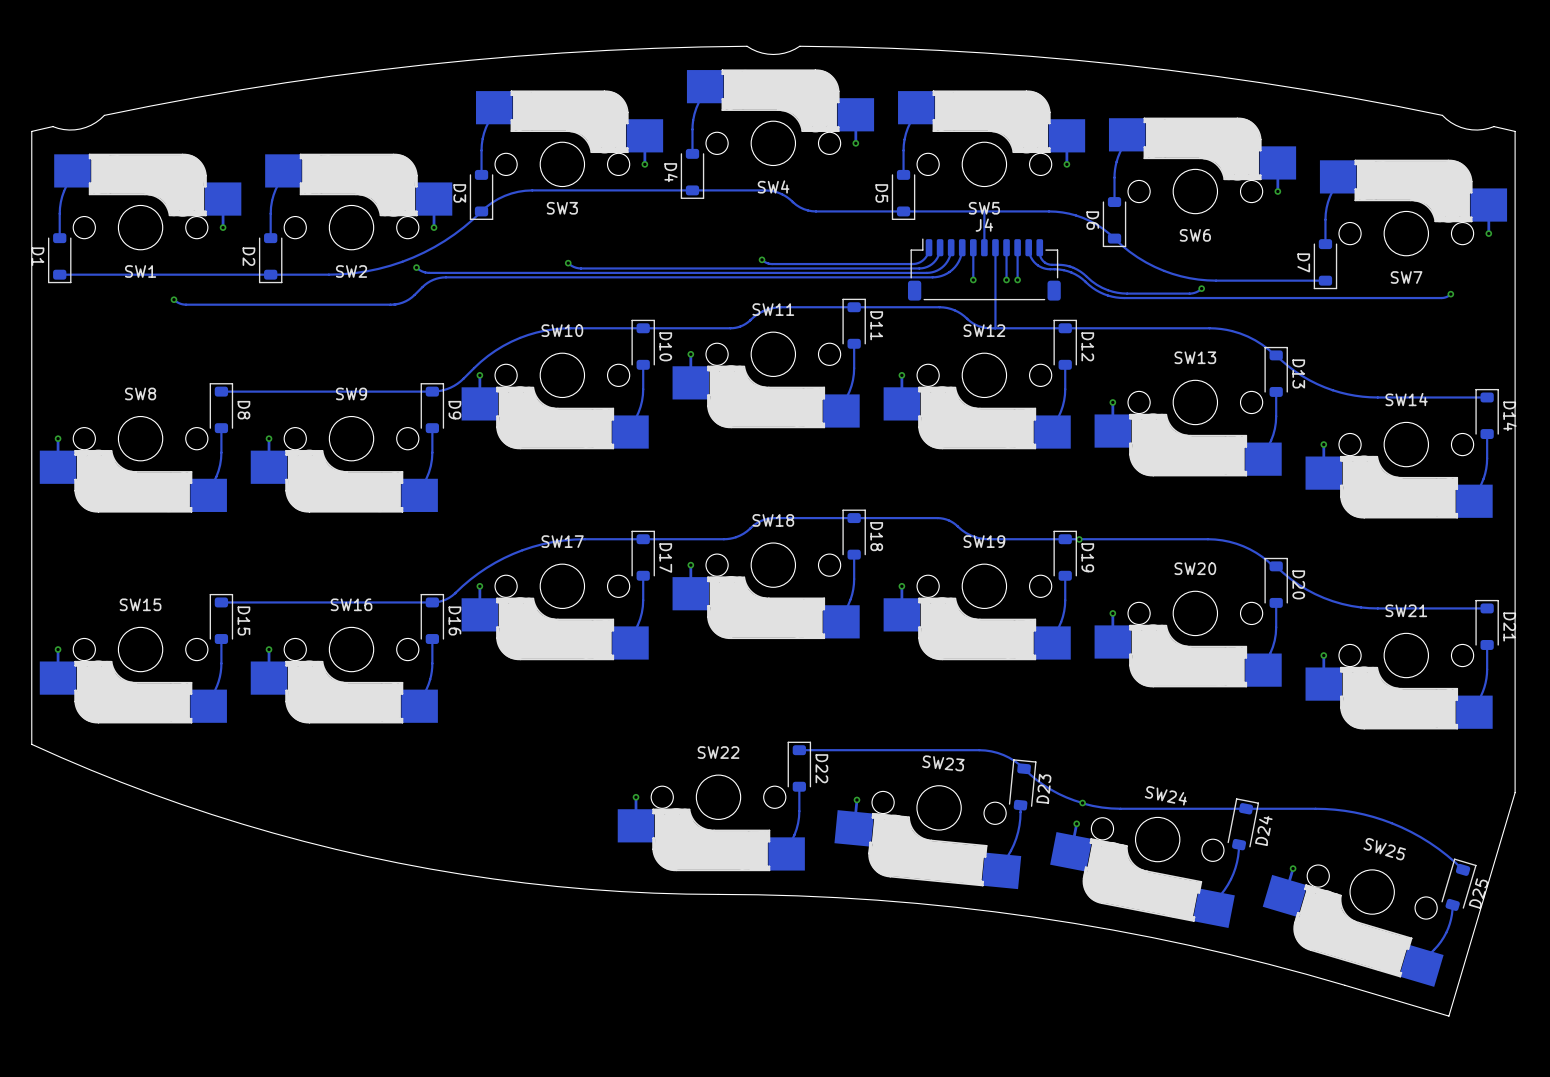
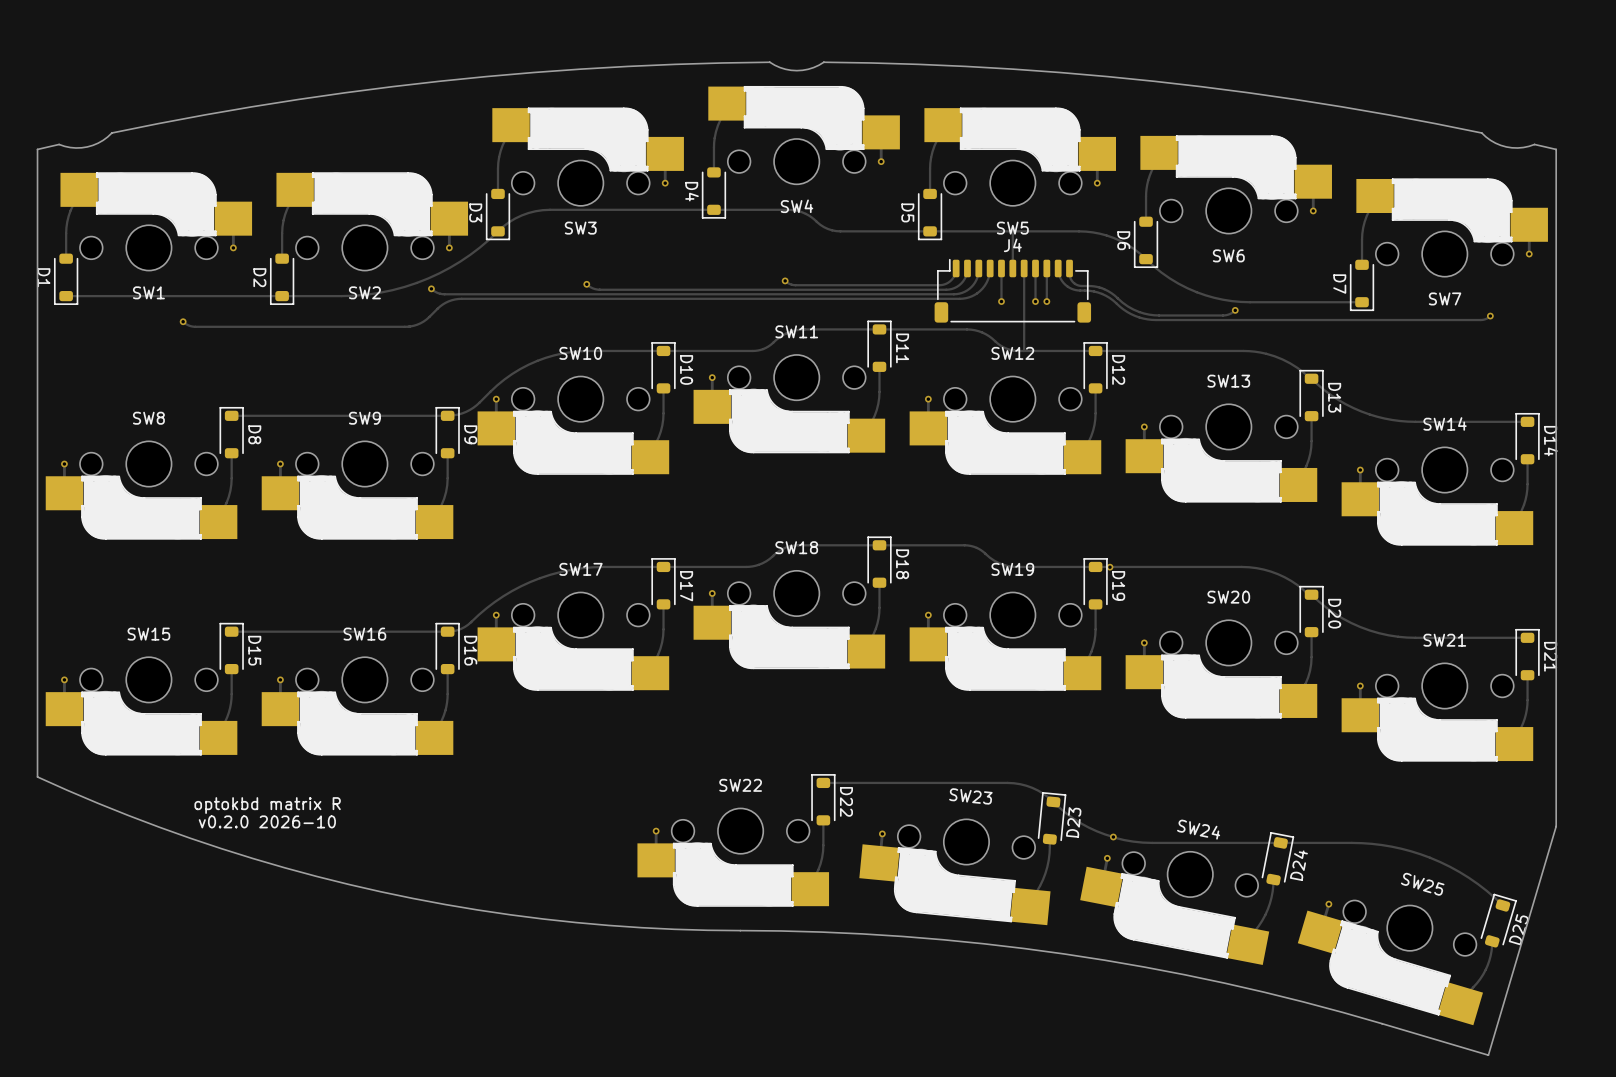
text: none -> optokbd matrix R (267, 805)
text: none -> v0.2.0 2026-10 (267, 821)

